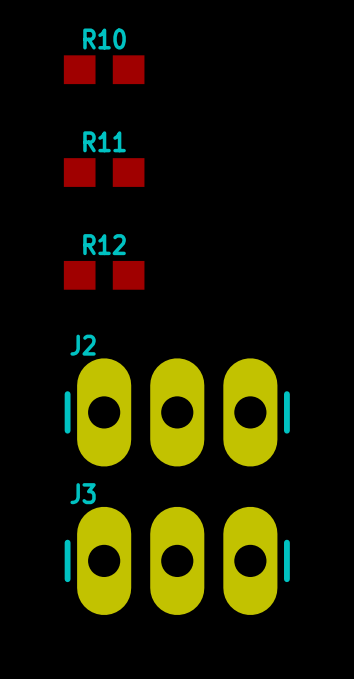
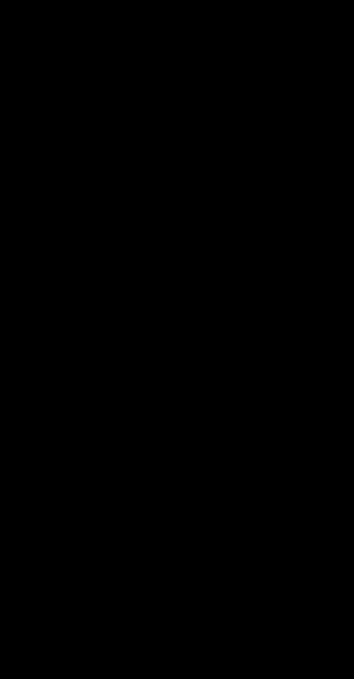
R10: (104, 69) -> none
R11: (104, 172) -> none
R12: (104, 275) -> none
J2: (177, 412) -> none
J3: (177, 560) -> none

